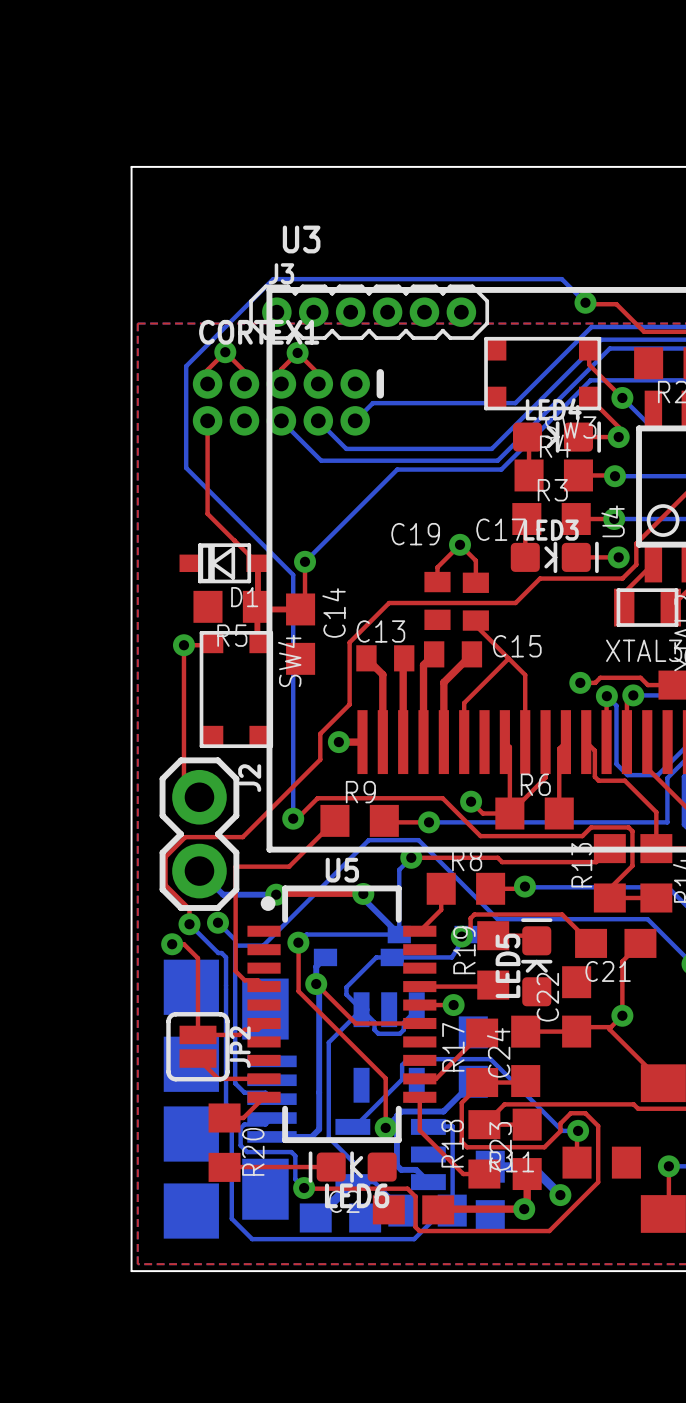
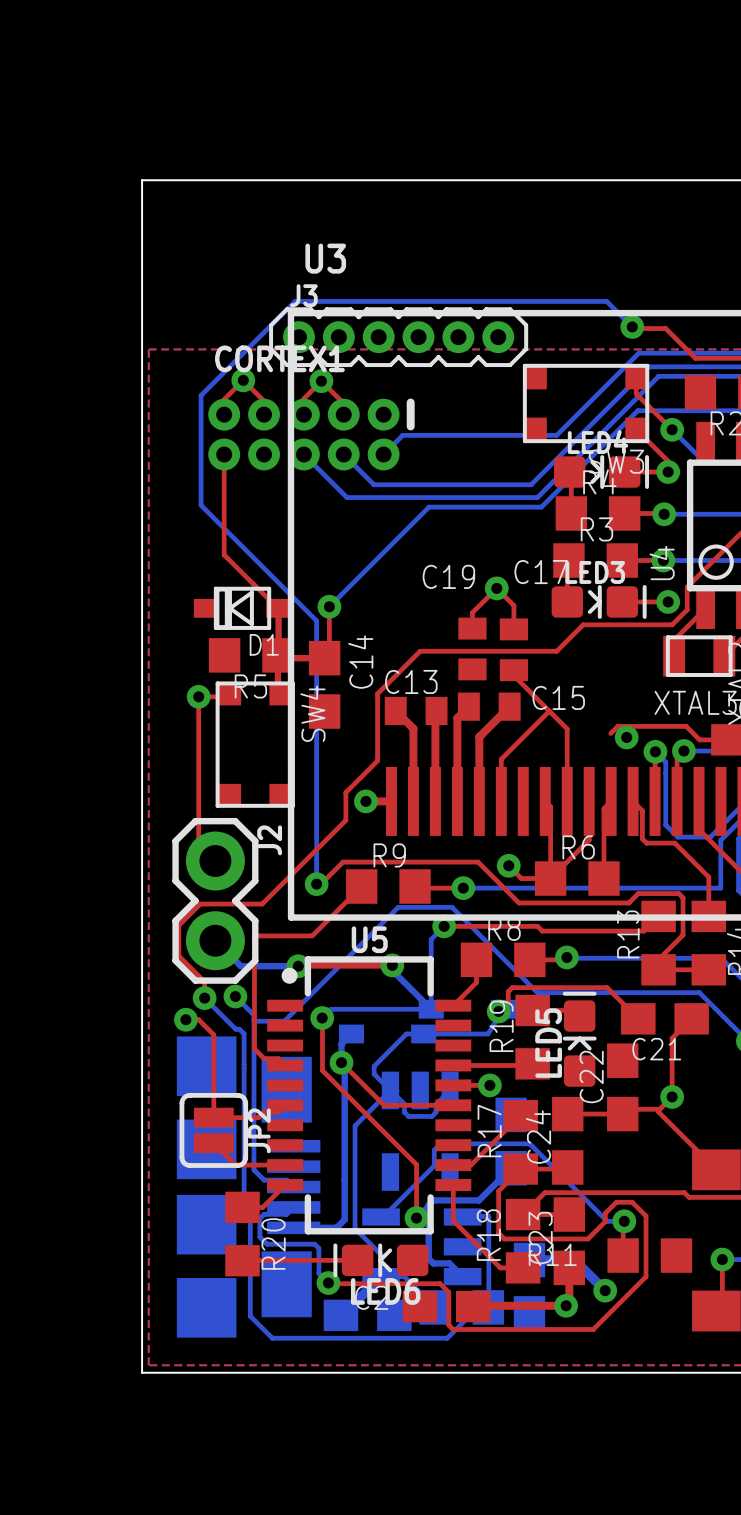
top track: (640, 677) (600, 677) (595, 682) (580, 682) -> (691, 731) (686, 726) (617, 726) (610, 733)

